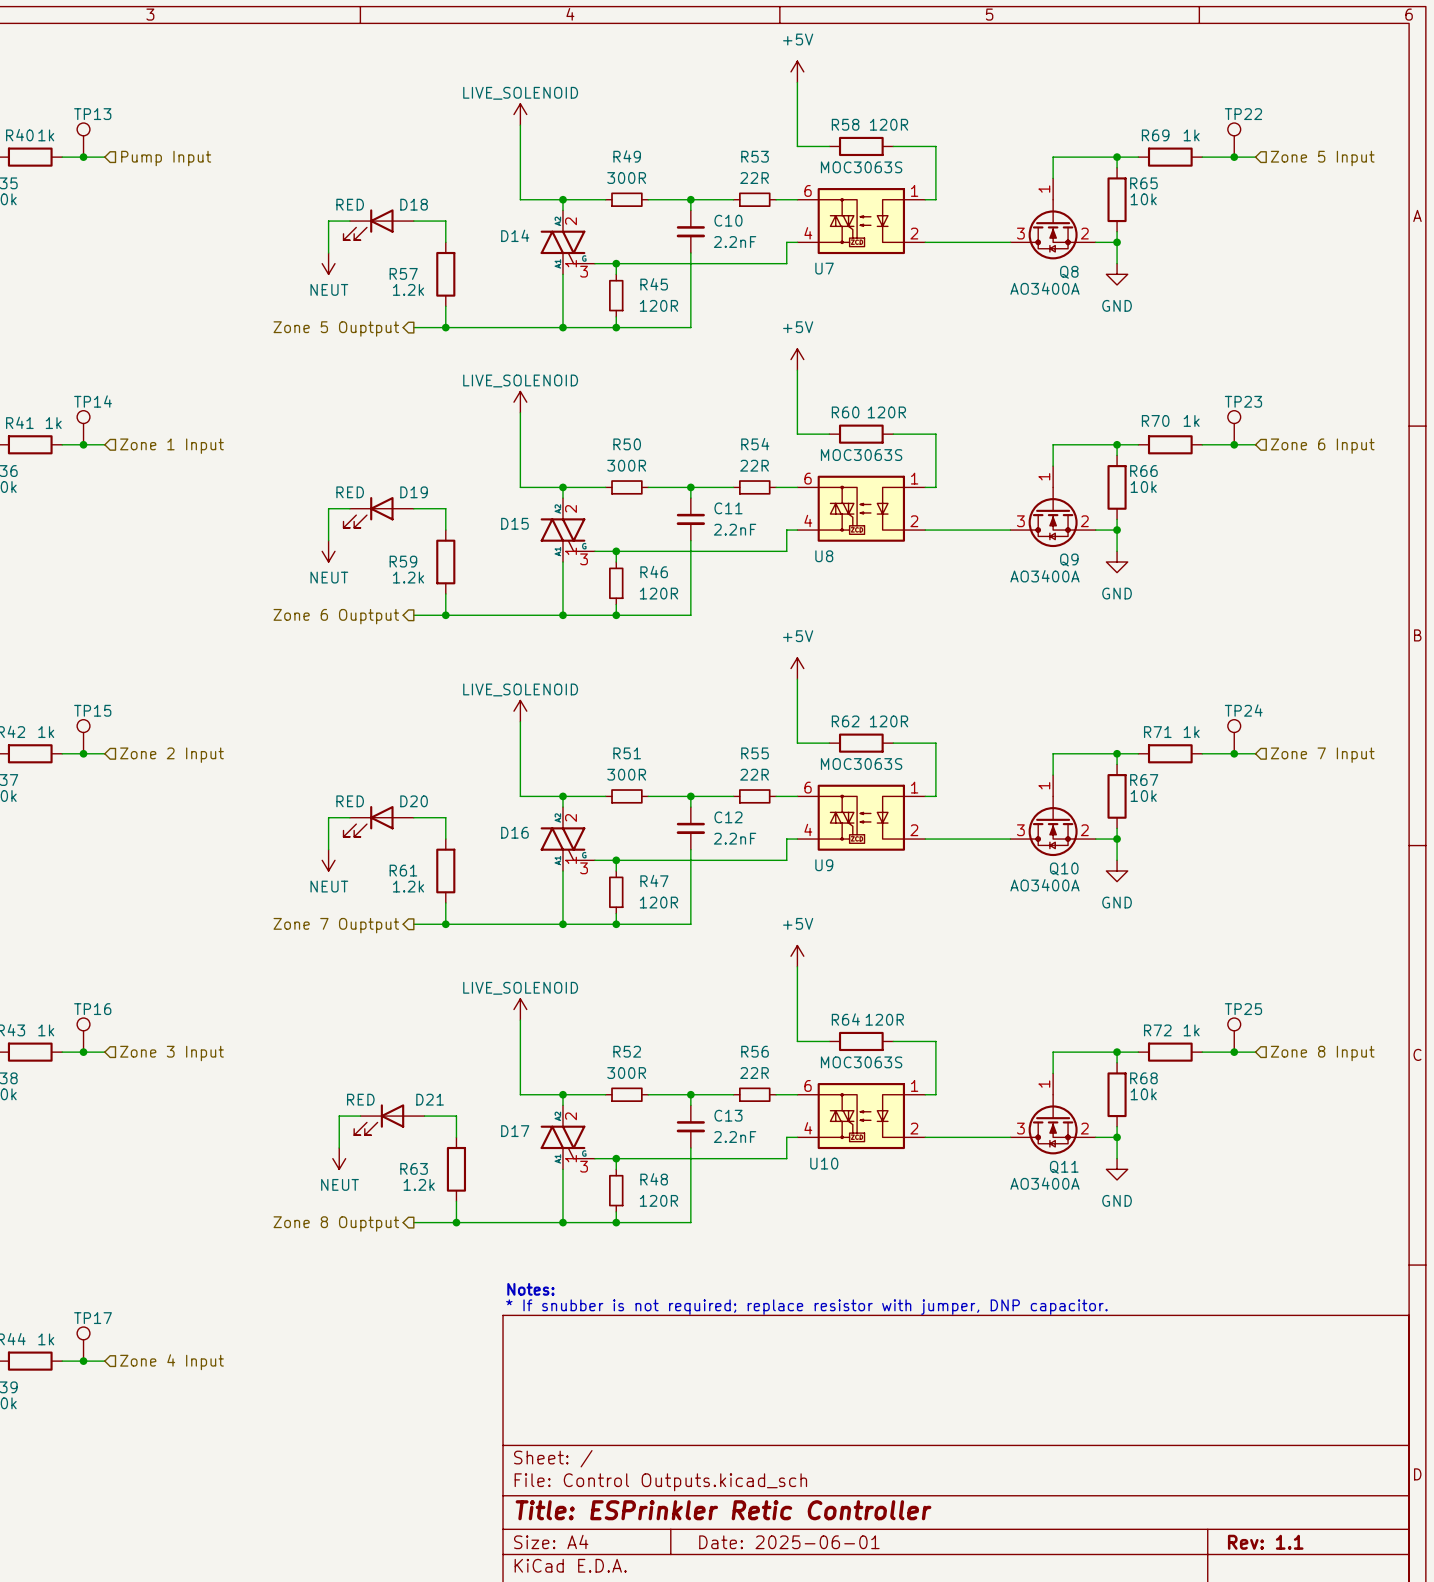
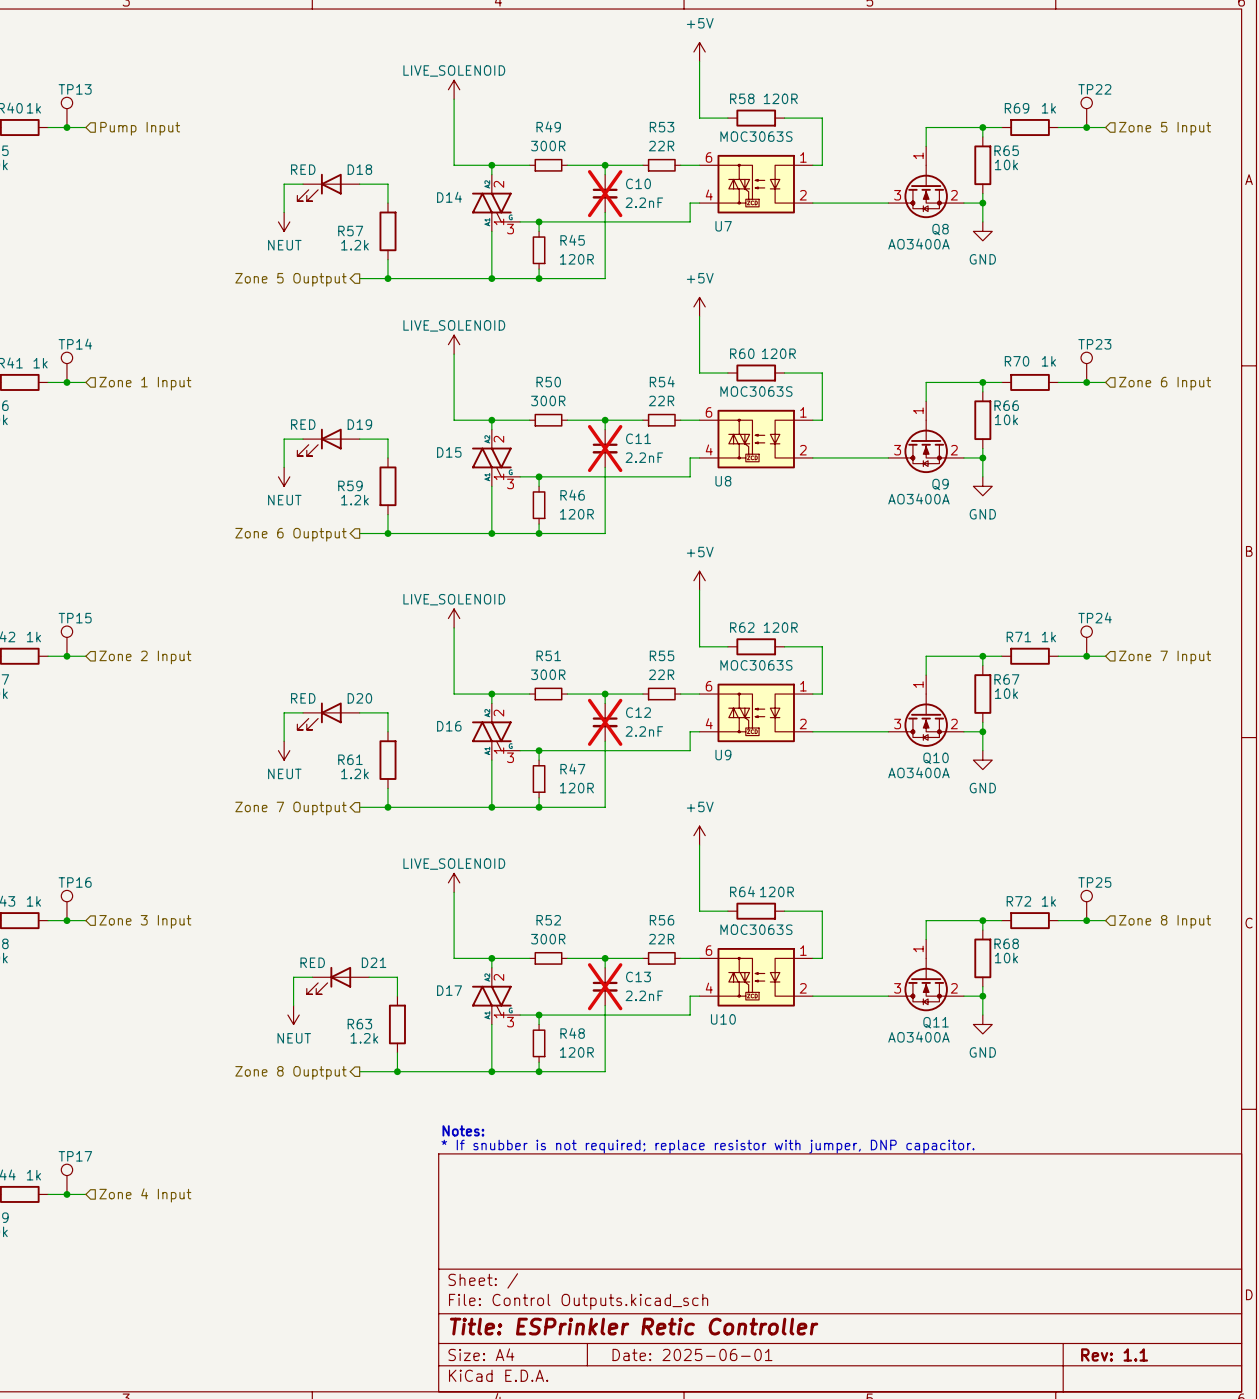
C10 do-not-place cross: none -> (605, 193)
C11 do-not-place cross: none -> (605, 448)
C12 do-not-place cross: none -> (605, 722)
C13 do-not-place cross: none -> (605, 986)

